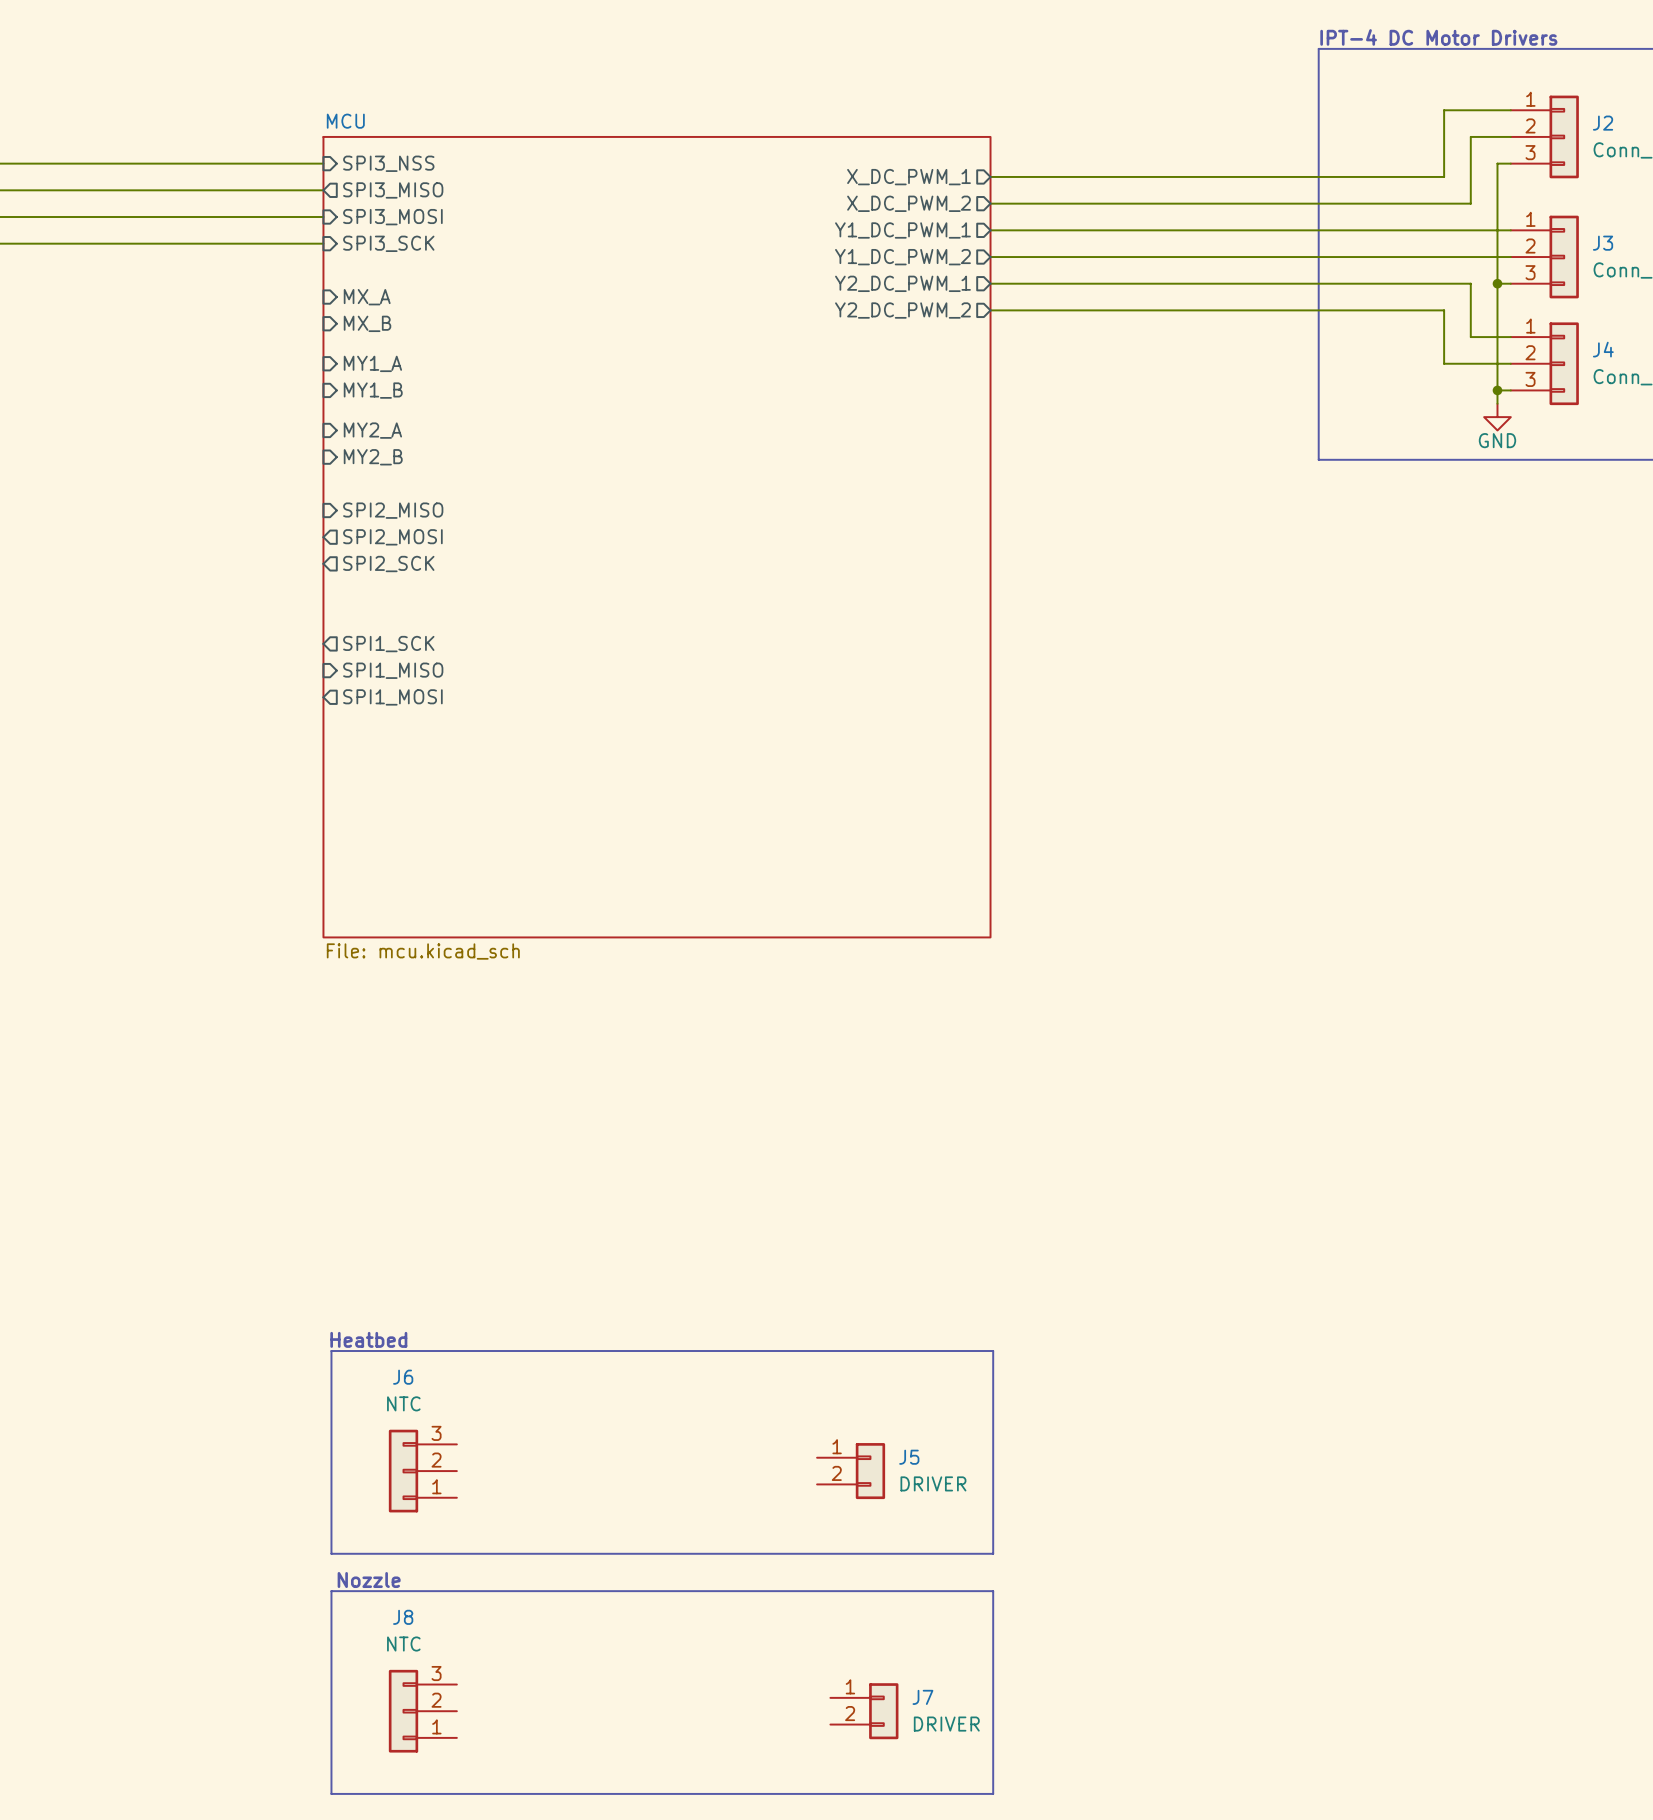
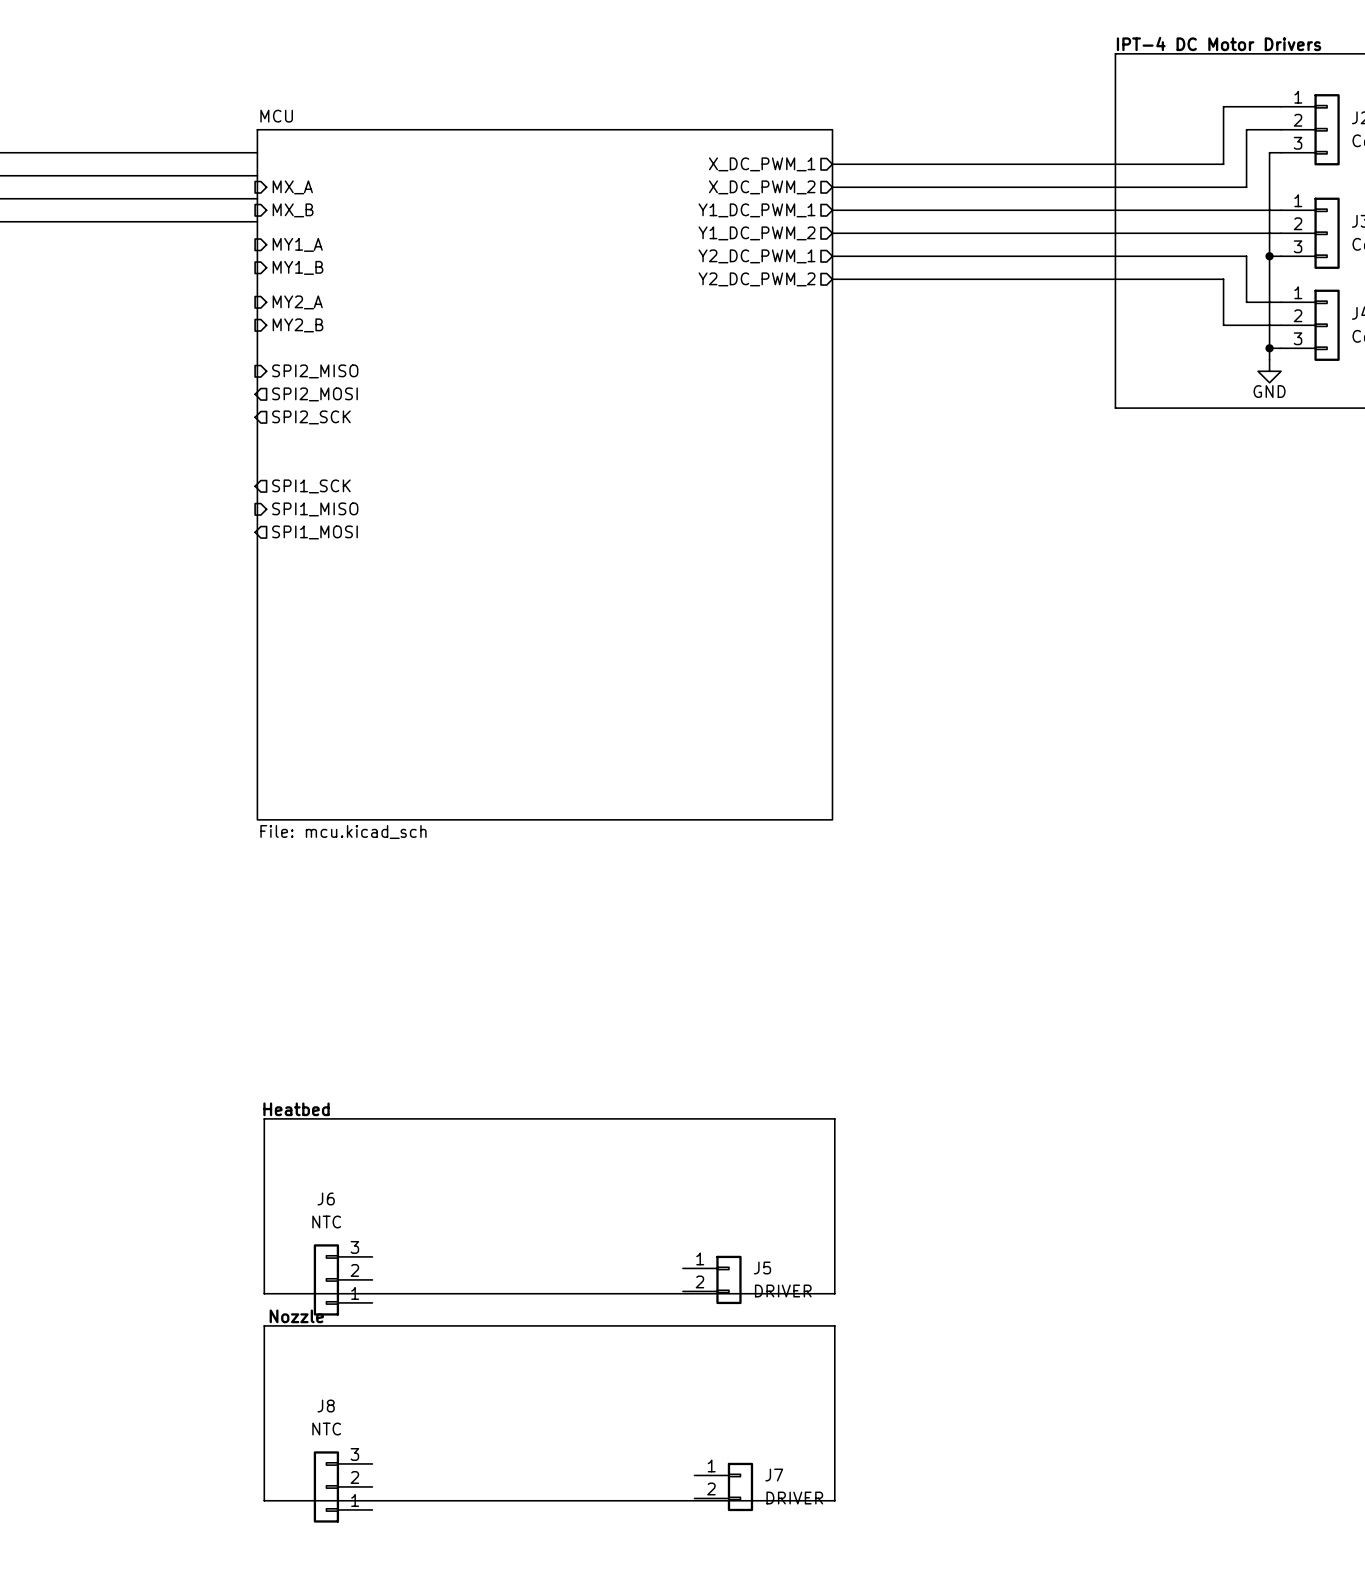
sheet pin: SPI3_NSS (388, 163) -> none
sheet pin: SPI3_MISO (393, 190) -> none
sheet pin: SPI3_MOSI (392, 217) -> none
sheet pin: SPI3_SCK (388, 243) -> none
sheet pin position: MX_A (367, 297) -> MX_A (292, 187)
sheet pin position: MX_B (367, 323) -> MX_B (293, 210)
sheet pin position: MY1_A (372, 363) -> MY1_A (297, 244)
sheet pin position: MY1_B (373, 390) -> MY1_B (298, 267)
sheet pin position: MY2_A (372, 430) -> MY2_A (297, 302)
sheet pin position: MY2_B (373, 457) -> MY2_B (298, 325)
sheet pin position: SPI2_MISO (393, 510) -> SPI2_MISO (315, 371)
sheet pin position: SPI2_MOSI (392, 537) -> SPI2_MOSI (314, 394)
sheet pin position: SPI2_SCK (388, 564) -> SPI2_SCK (311, 417)
sheet pin position: SPI1_SCK (388, 644) -> SPI1_SCK (311, 486)
sheet pin position: SPI1_MISO (393, 670) -> SPI1_MISO (315, 509)
sheet pin position: SPI1_MOSI (392, 697) -> SPI1_MOSI (314, 532)
text position: Heatbed (368, 1339) -> Heatbed (296, 1109)
line: (331, 1351) (993, 1351) -> (264, 1176) (264, 1118) (834, 1118) (834, 1176)
line: (331, 1487) (331, 1524) -> (264, 1293) (834, 1293)
line: (993, 1487) (993, 1524) -> (264, 1325) (834, 1325)
line: (331, 1553) (993, 1553) -> (264, 1351) (264, 1383)
text position: Nozzle (369, 1580) -> Nozzle (296, 1316)
line: (331, 1591) (993, 1591) -> (834, 1351) (834, 1383)
line: (331, 1727) (331, 1793) (993, 1793) (993, 1727) -> (264, 1500) (834, 1500)

